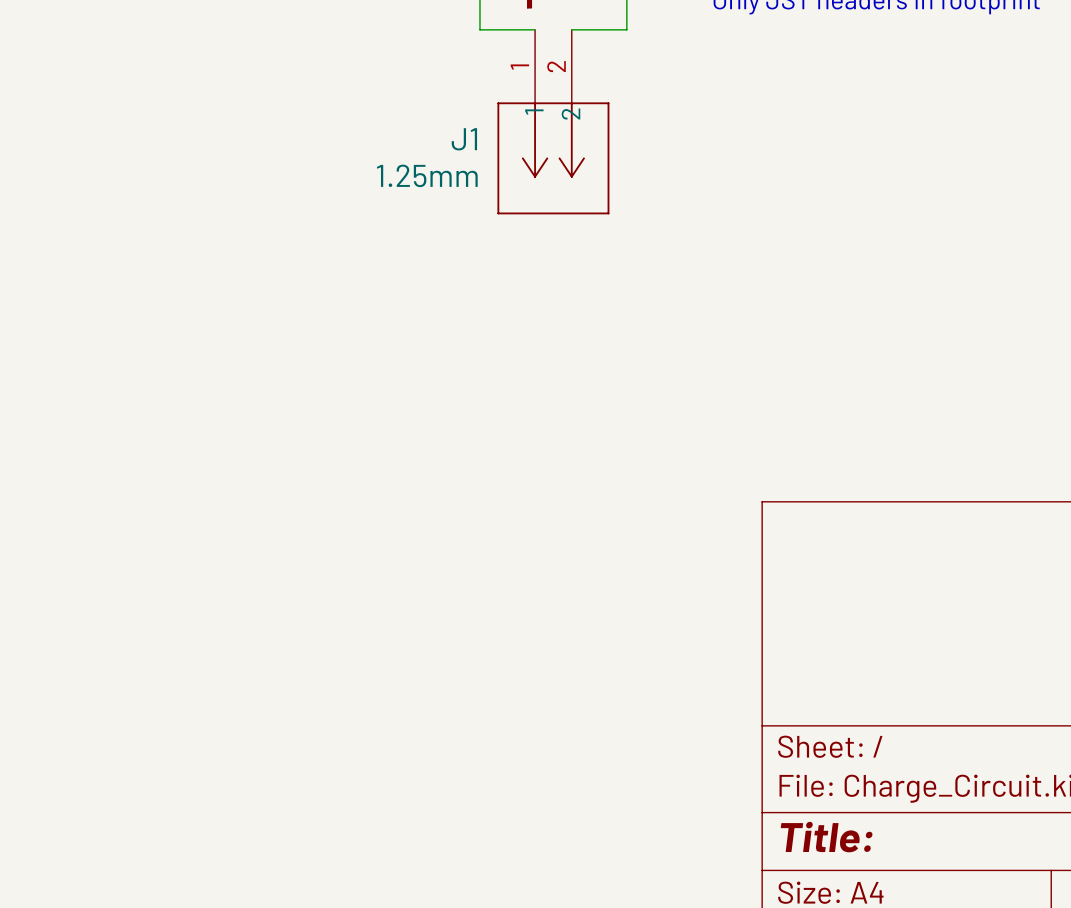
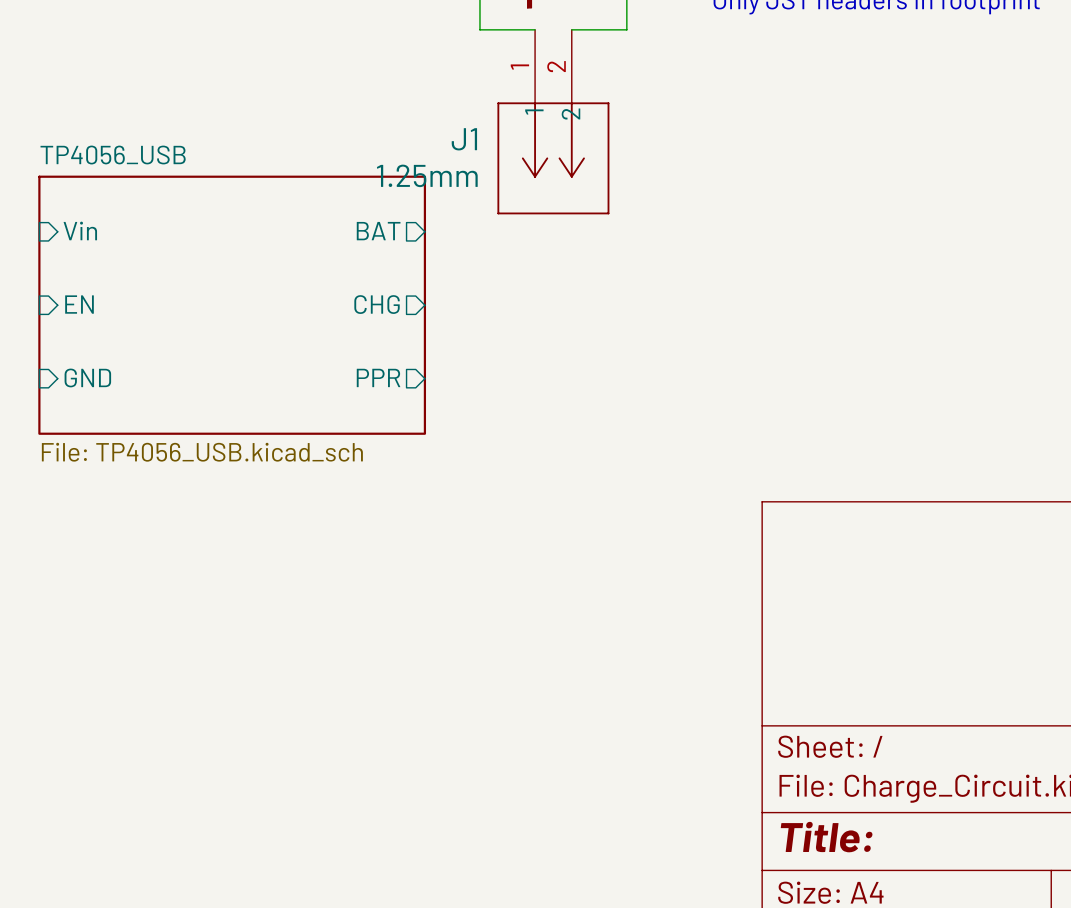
sheet pin: none -> Vin (80, 230)
sheet pin: none -> BAT (378, 231)
sheet pin: none -> EN (79, 304)
sheet pin: none -> CHG (377, 304)
sheet TP4056_USB: none -> File: TP4056_USB.kicad_sch (232, 305)
sheet pin: none -> GND (87, 377)
sheet pin: none -> PPR (378, 377)

